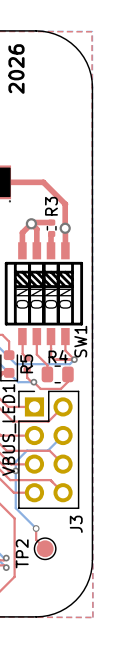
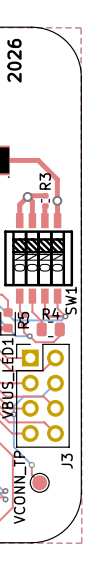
TP2 name: TP2 (22, 553) -> VCONN_TP (20, 487)

